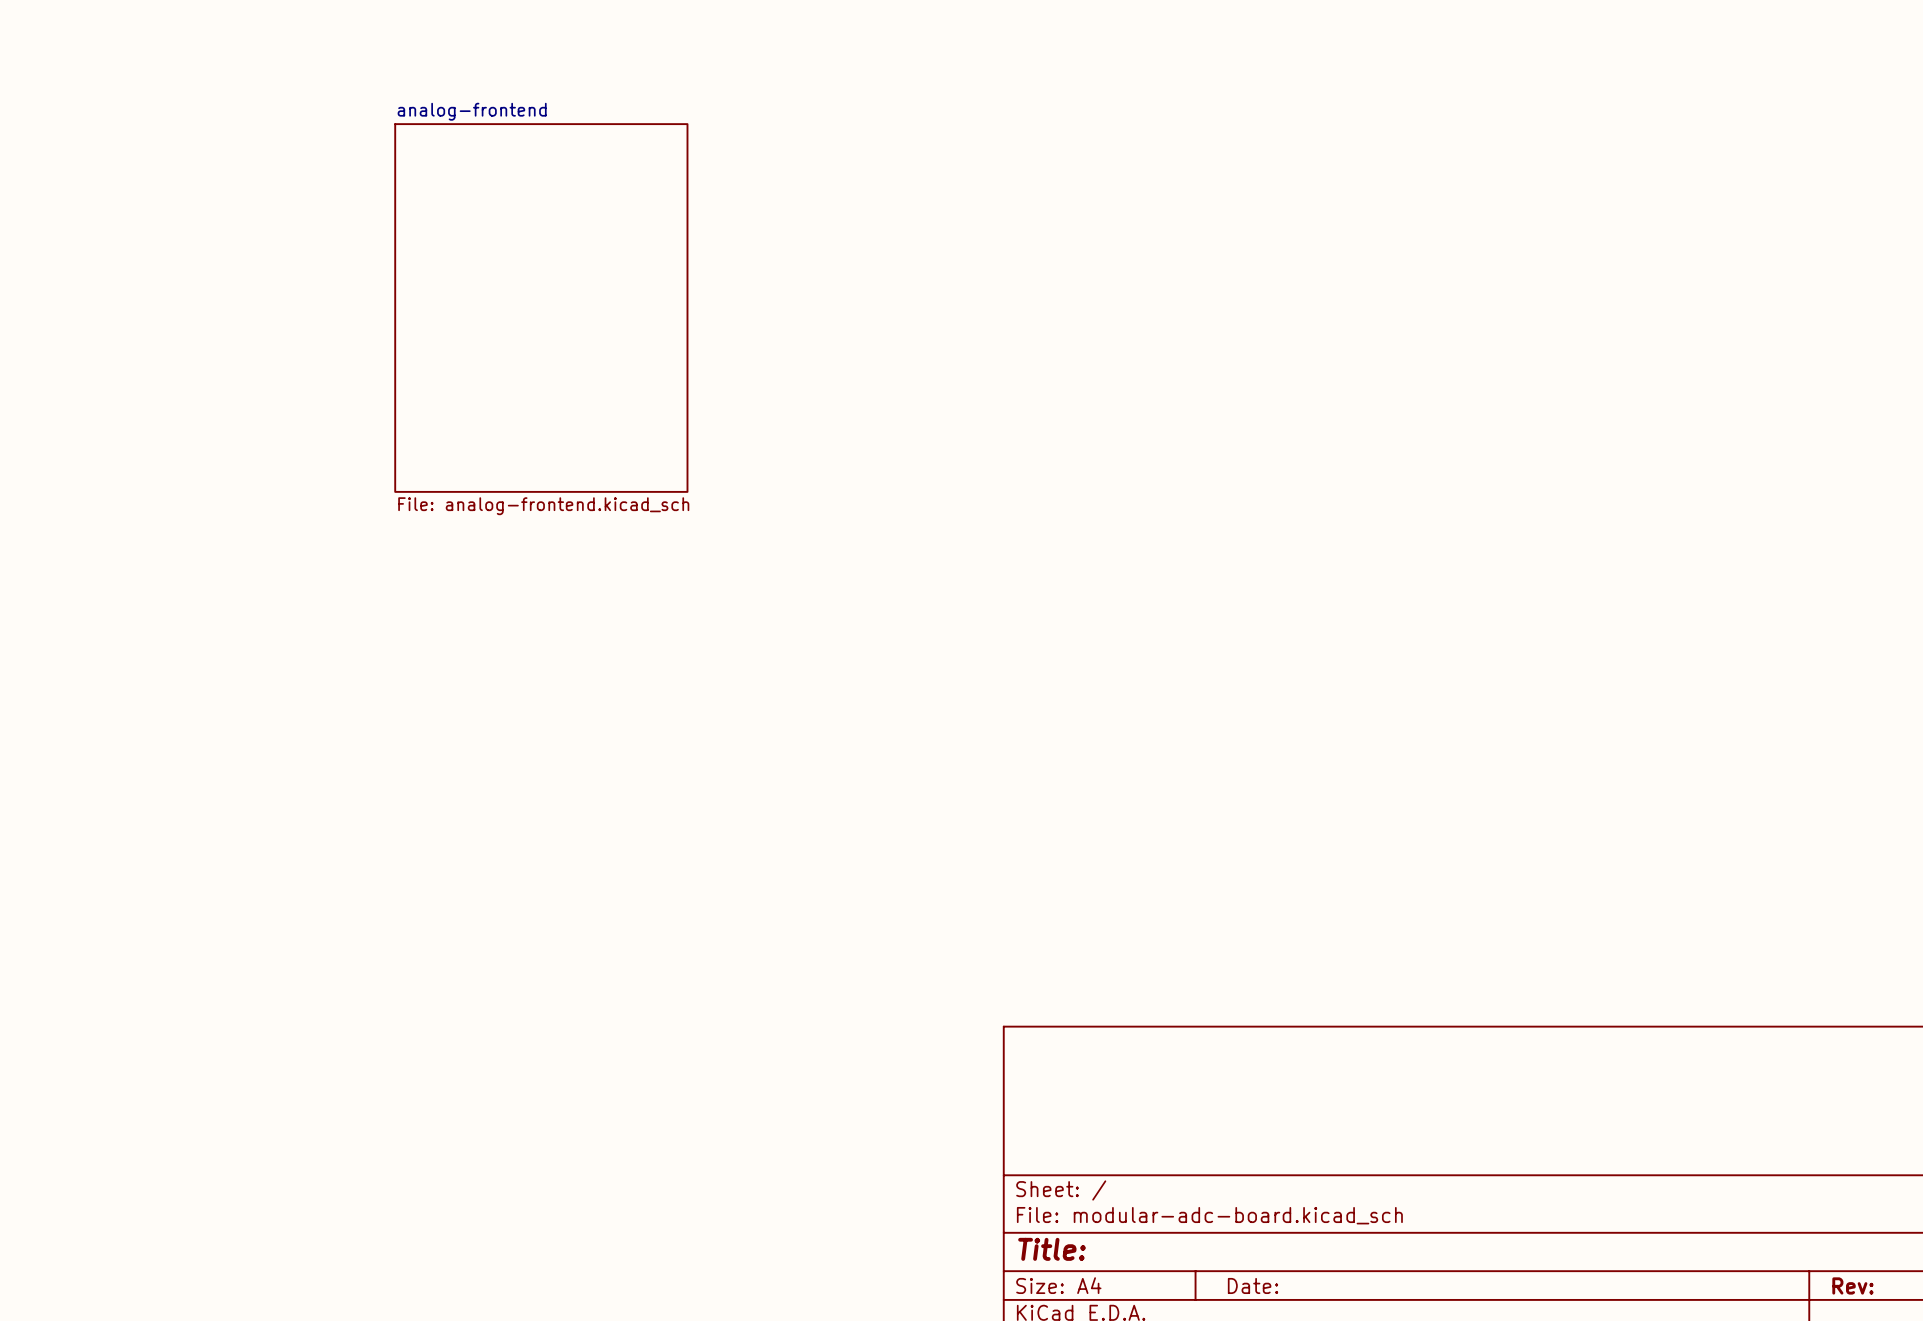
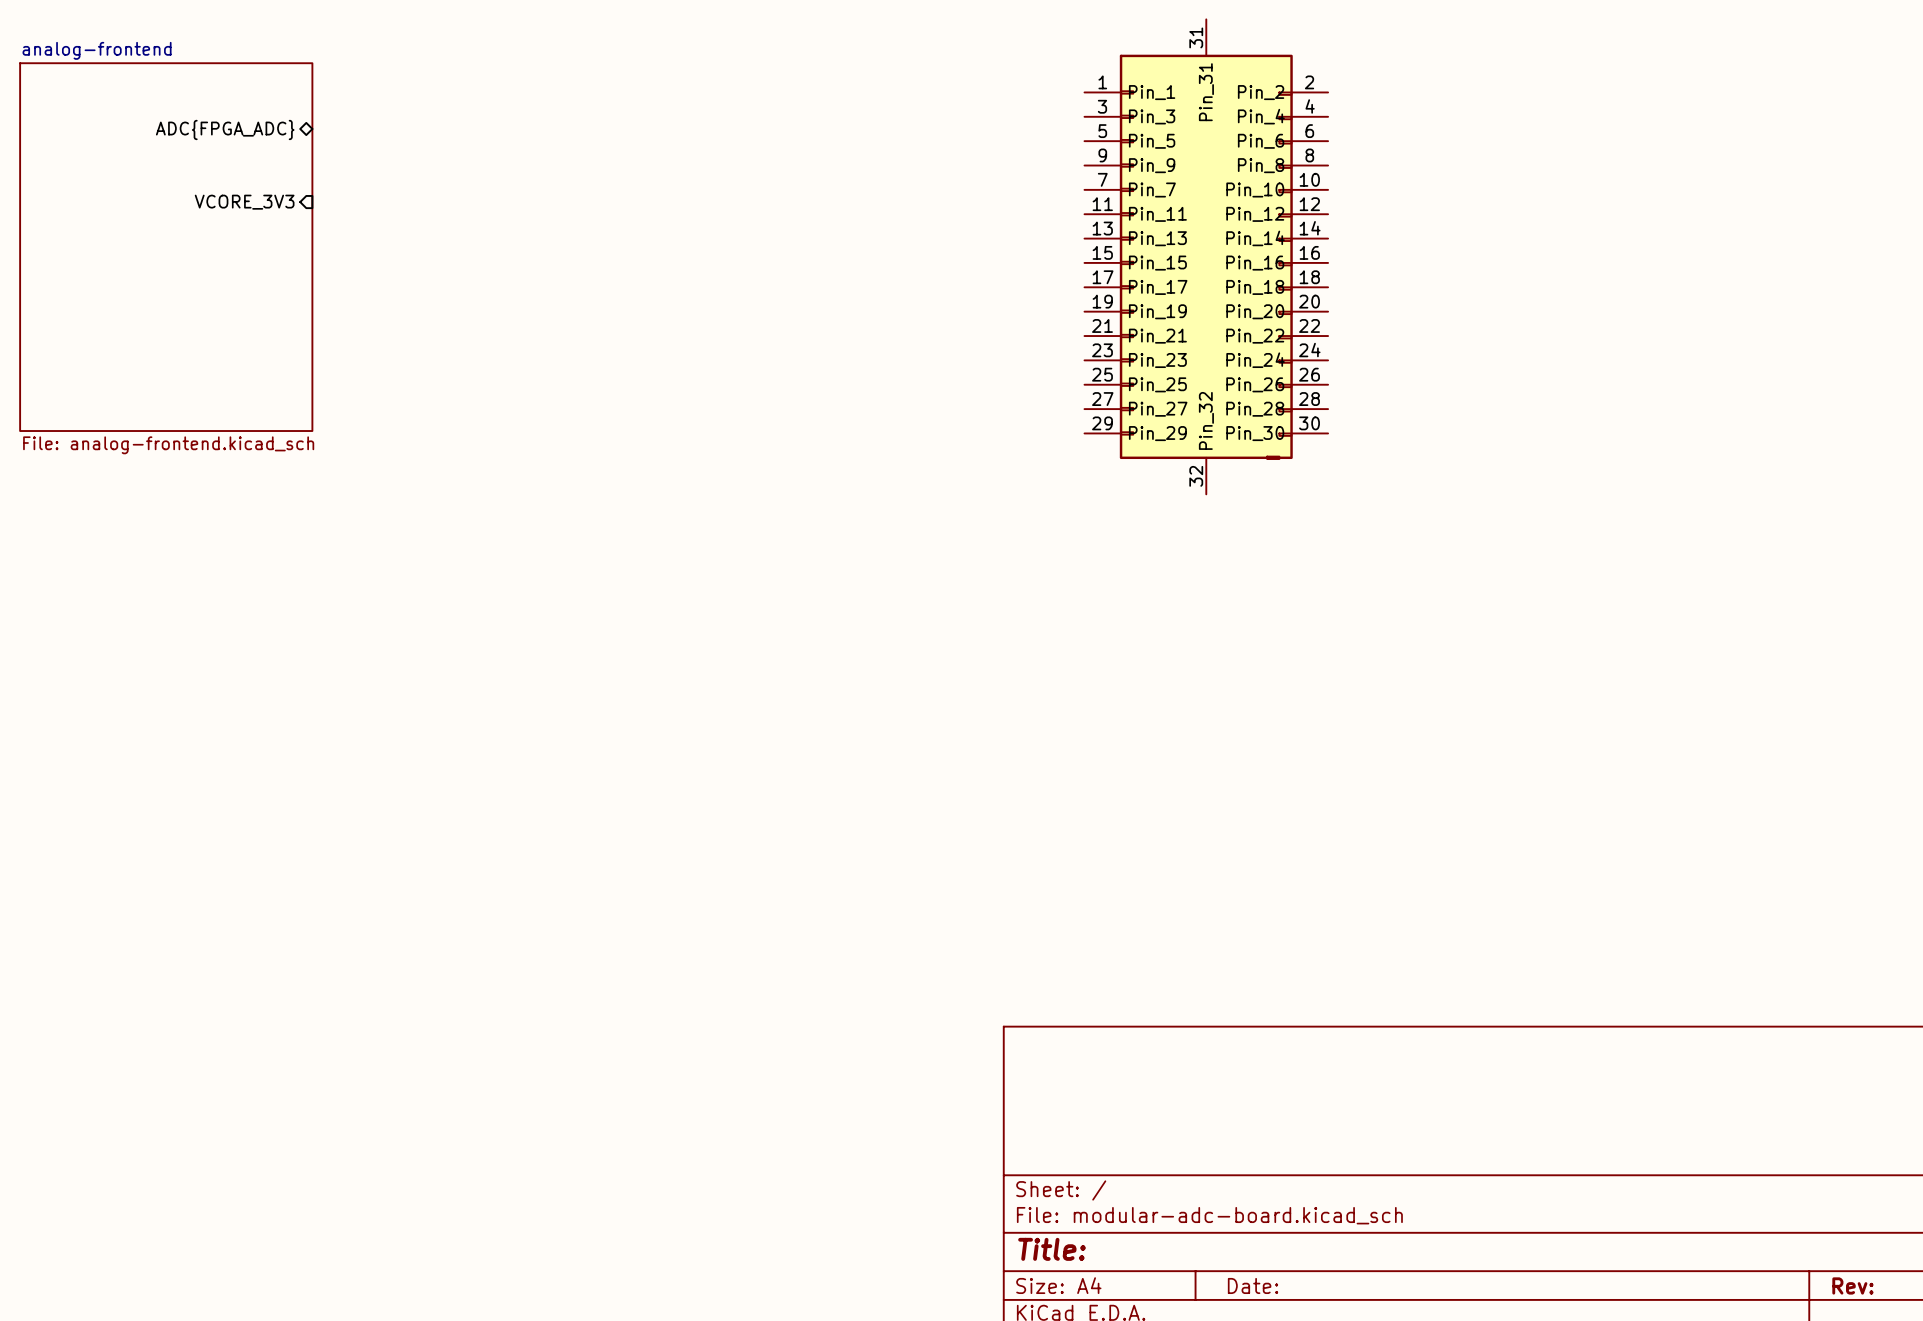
sheet pin: none -> ADC{FPGA_ADC} (225, 129)
sheet pin: none -> VCORE_3V3 (244, 202)
sheet analog-frontend: none -> File: analog-frontend.kicad_sch (166, 247)
part: none -> (1206, 256)
sheet analog-frontend: File: analog-frontend.kicad_sch (541, 308) -> none

